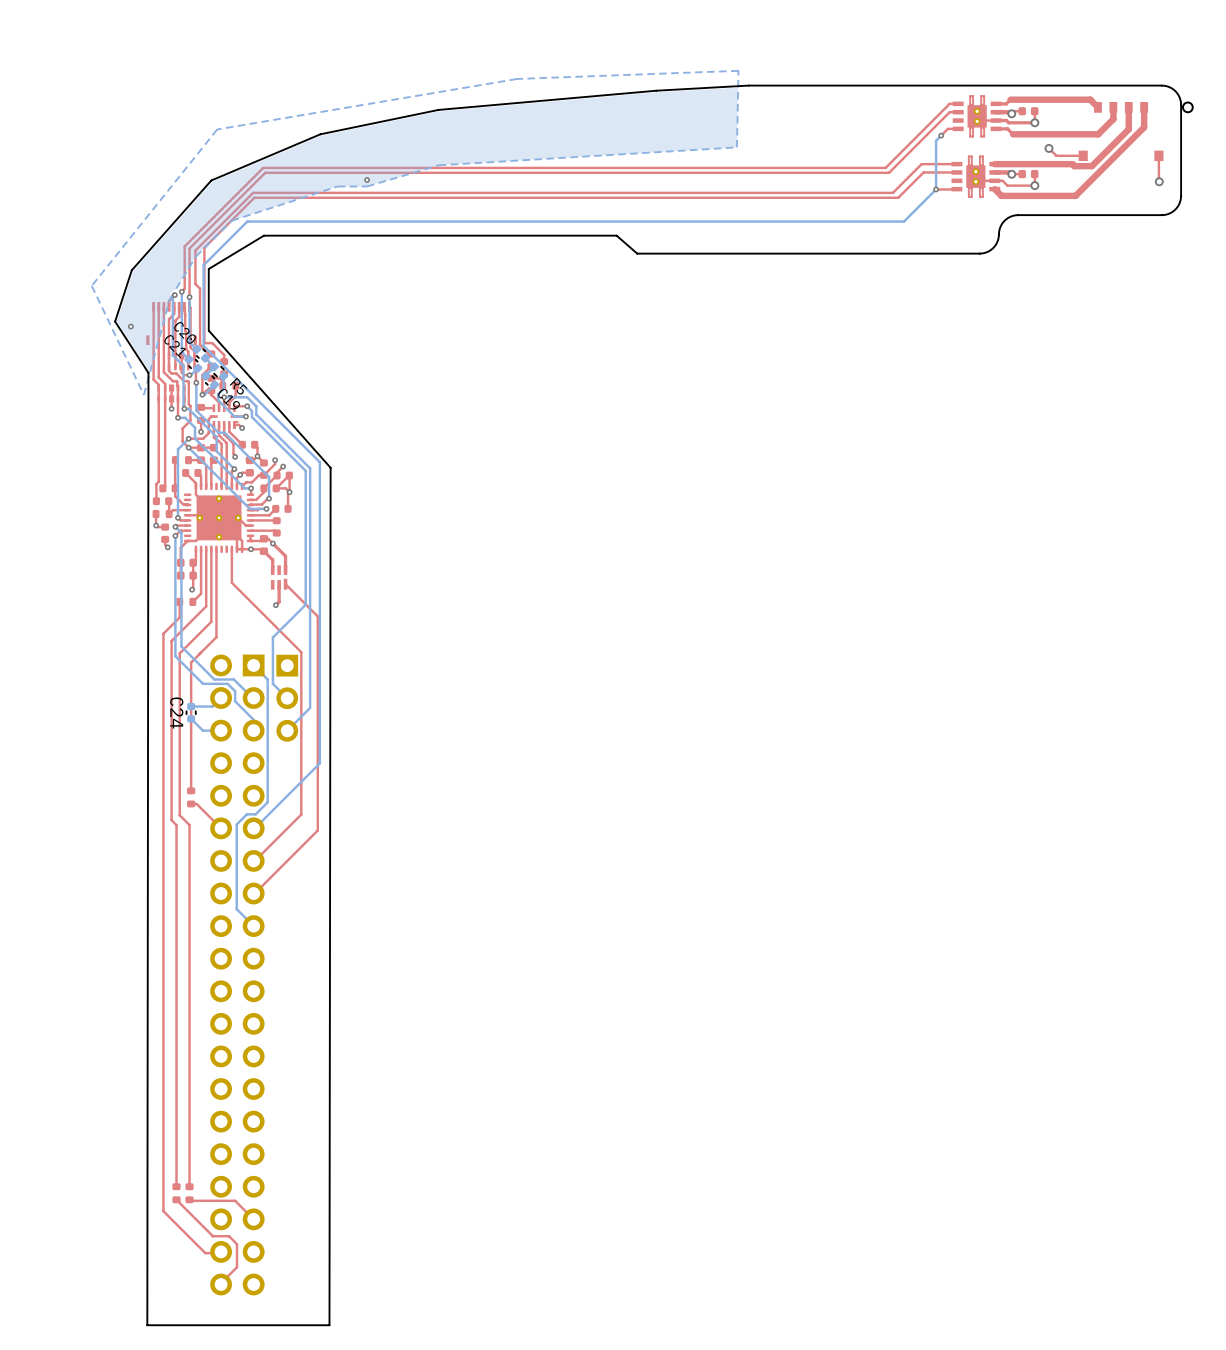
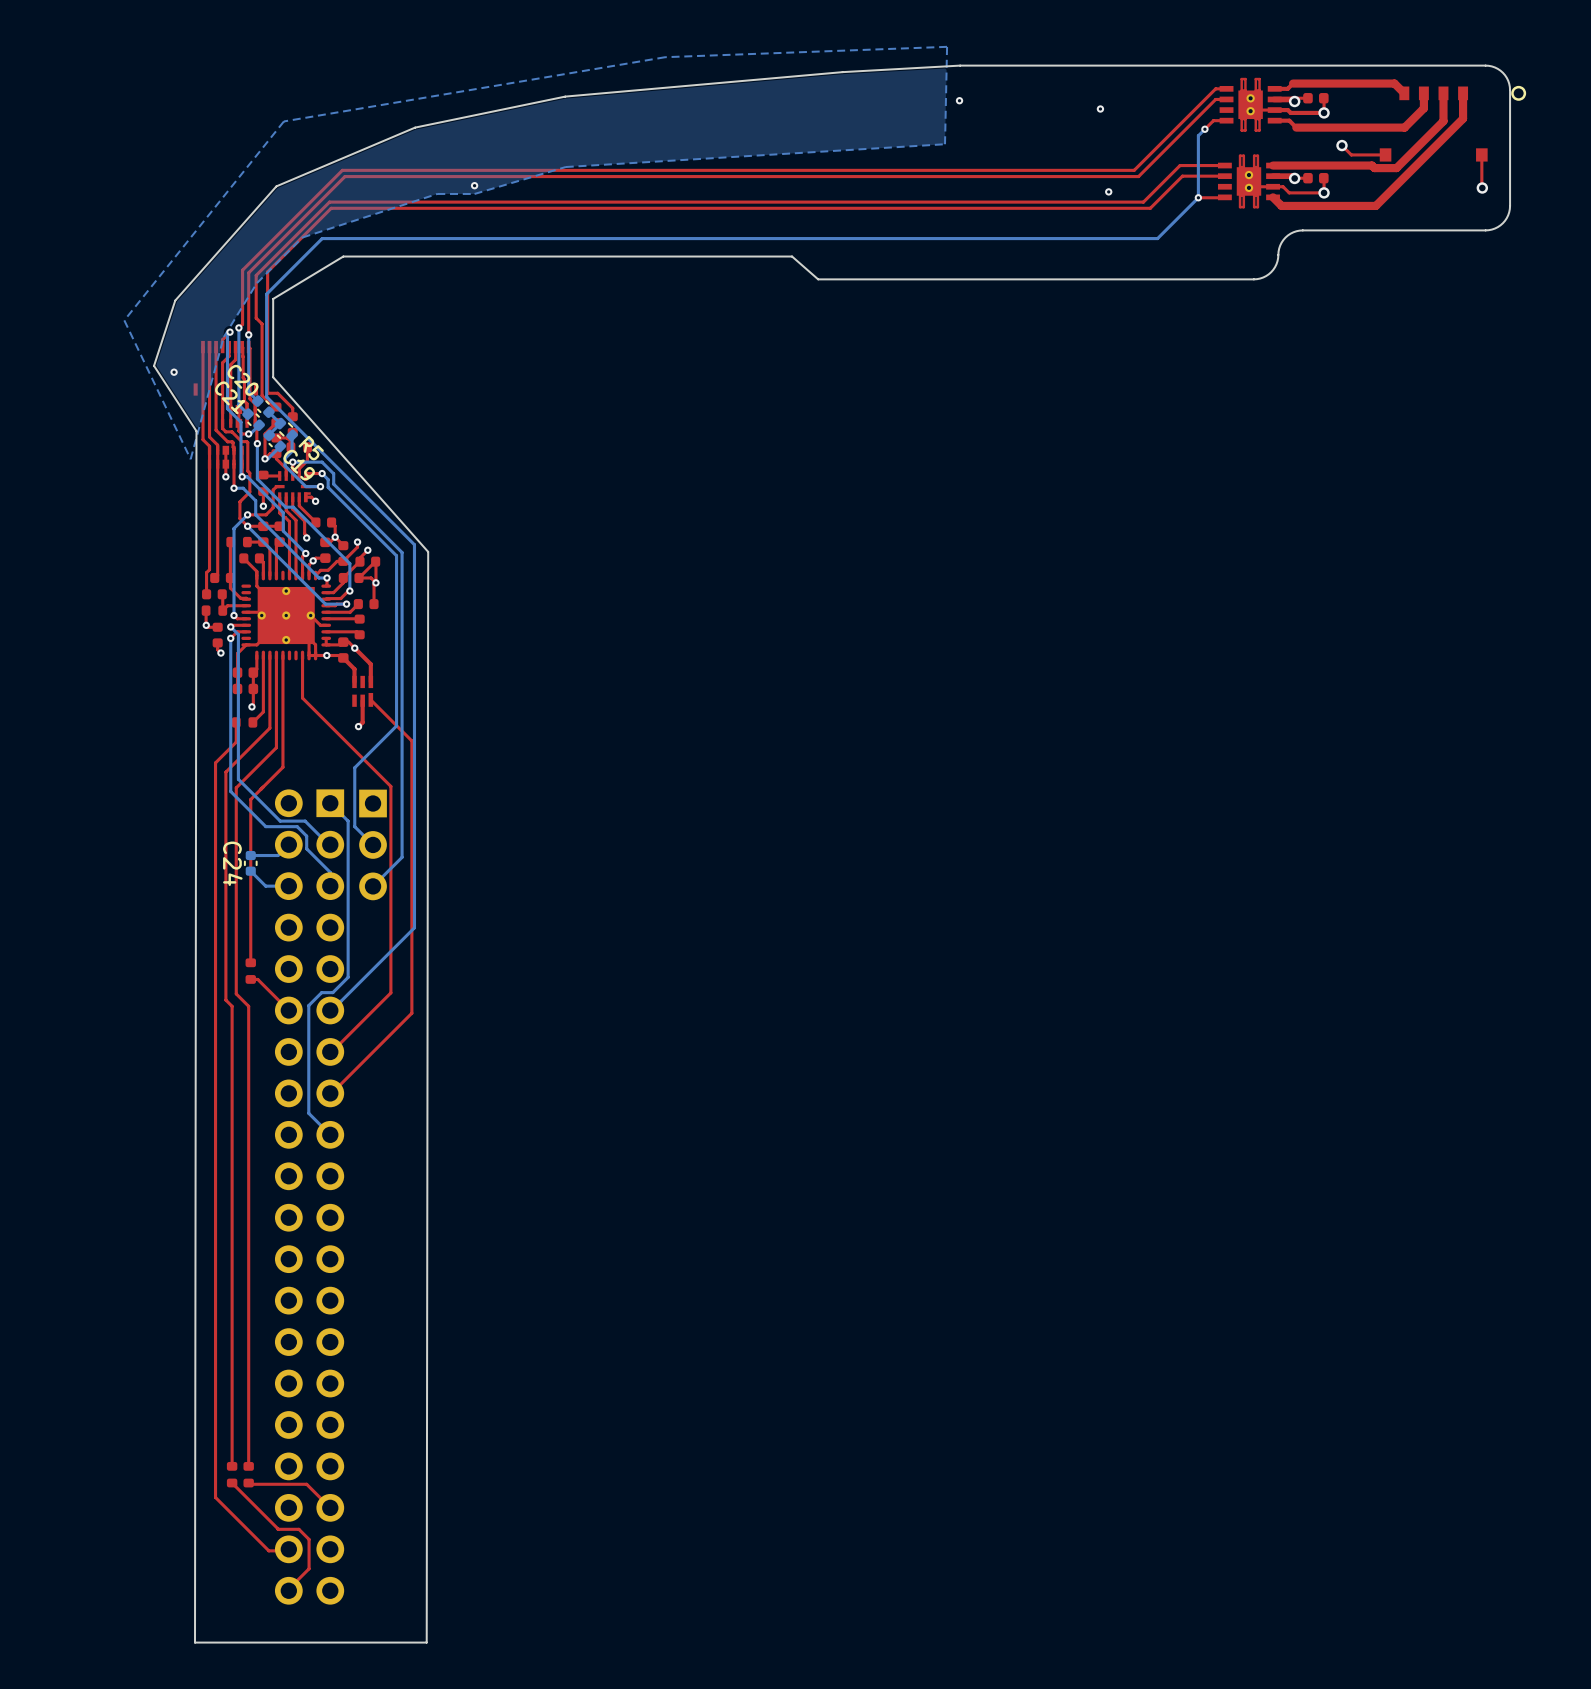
via: none -> (959, 100)
via: none -> (1100, 109)
via: none -> (1108, 191)

